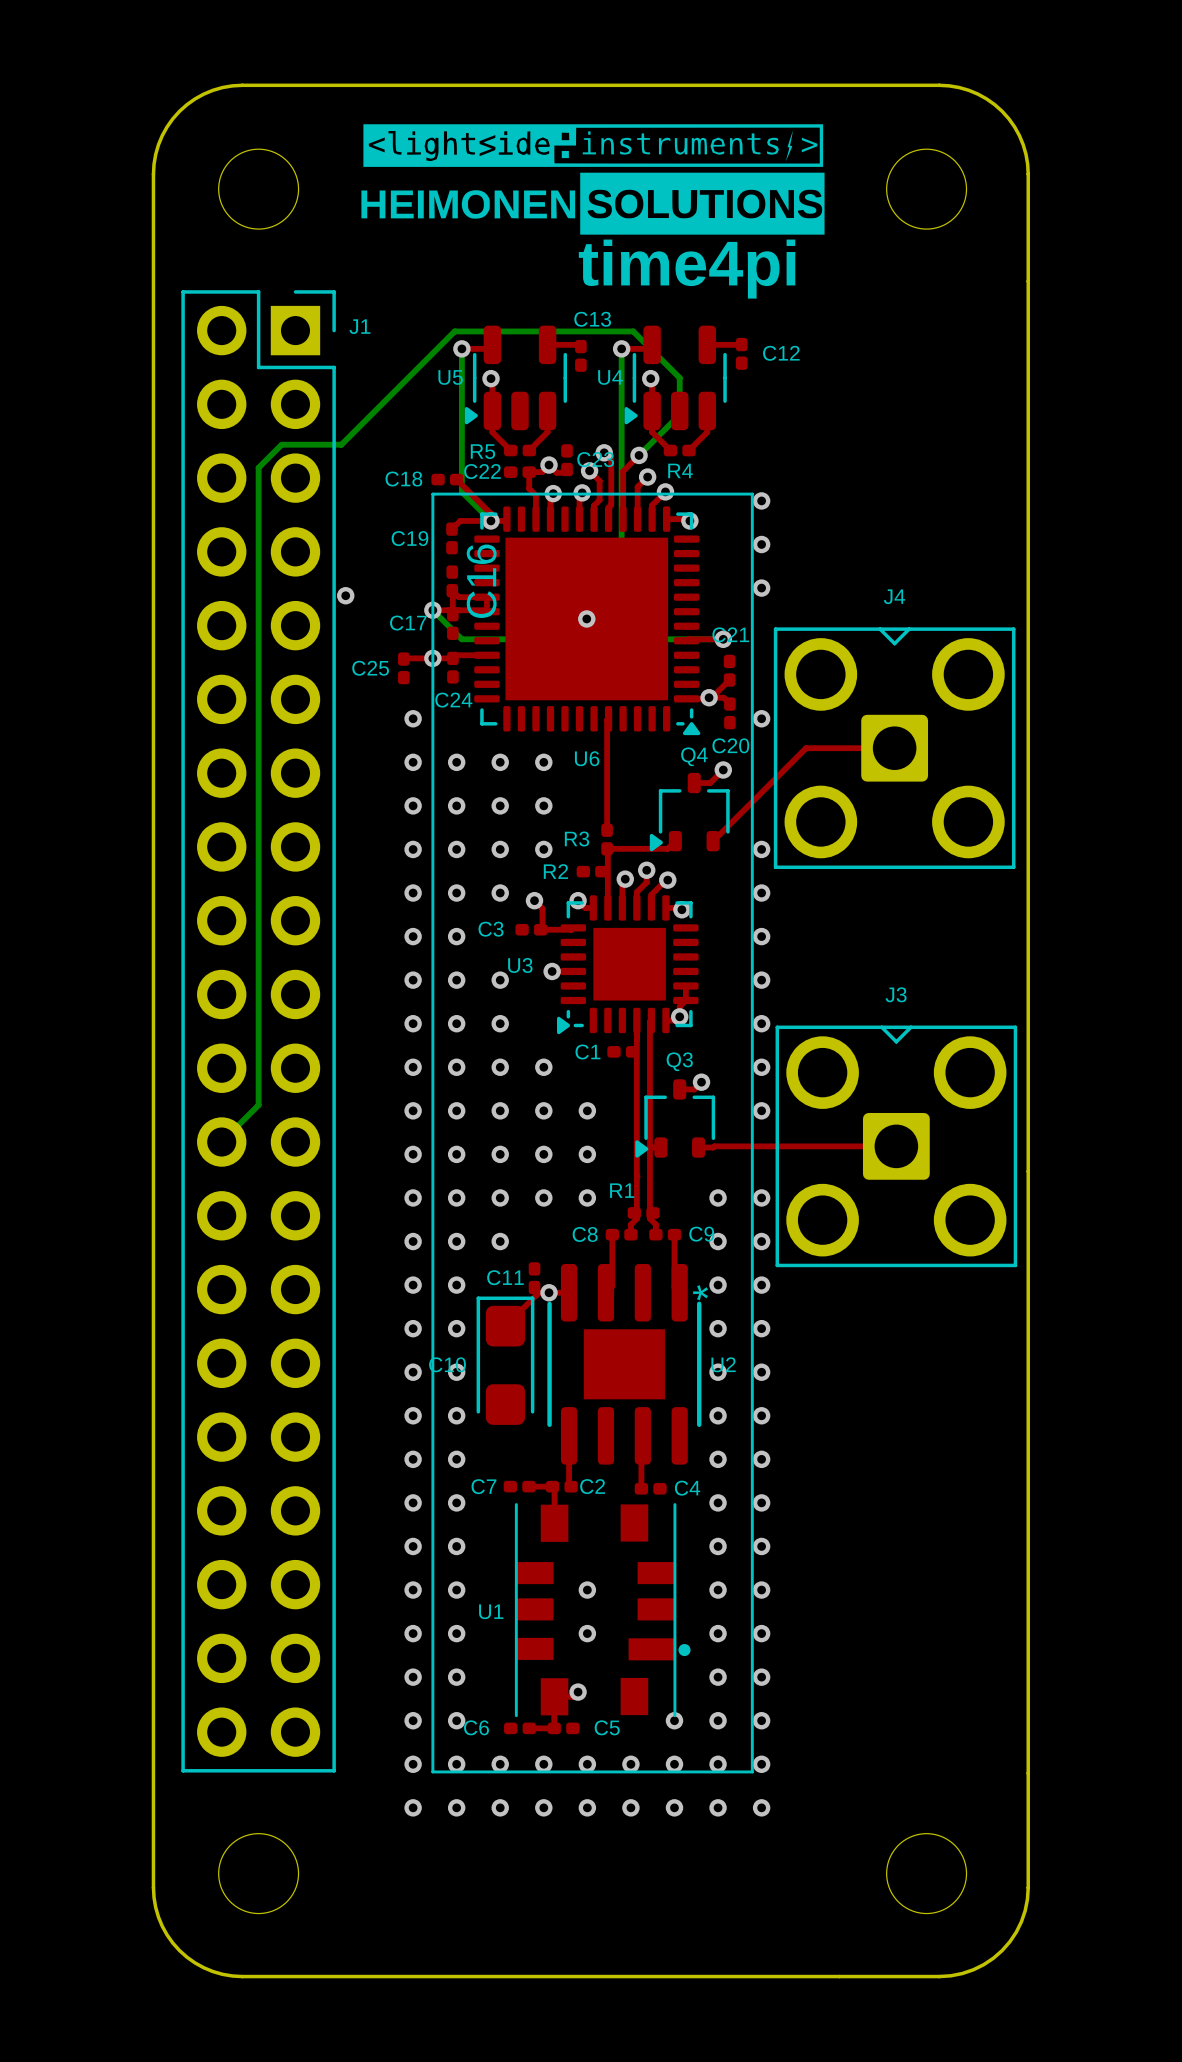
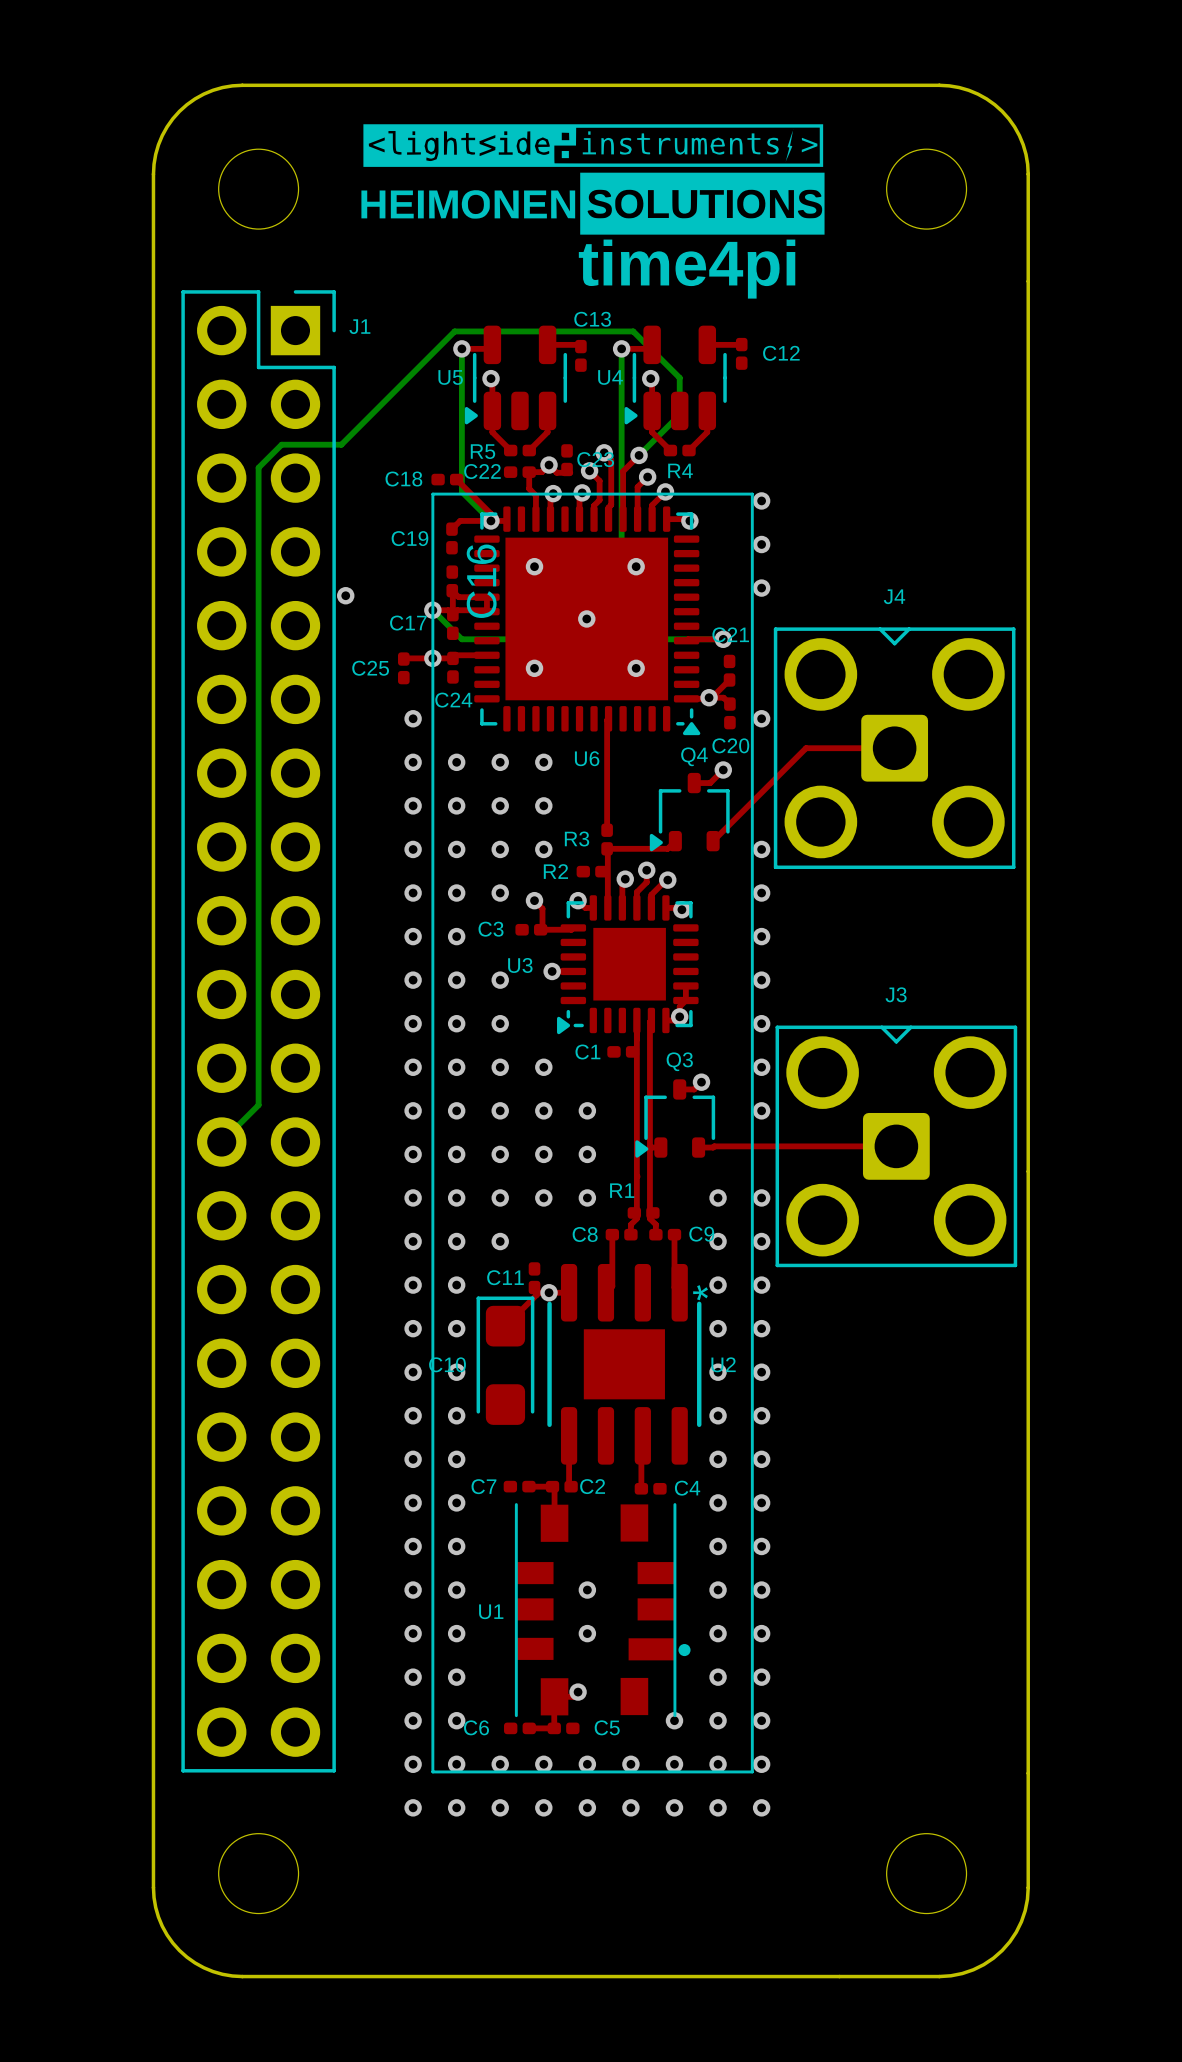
via: none -> (534, 566)
via: none -> (636, 566)
via: none -> (534, 668)
via: none -> (636, 668)

